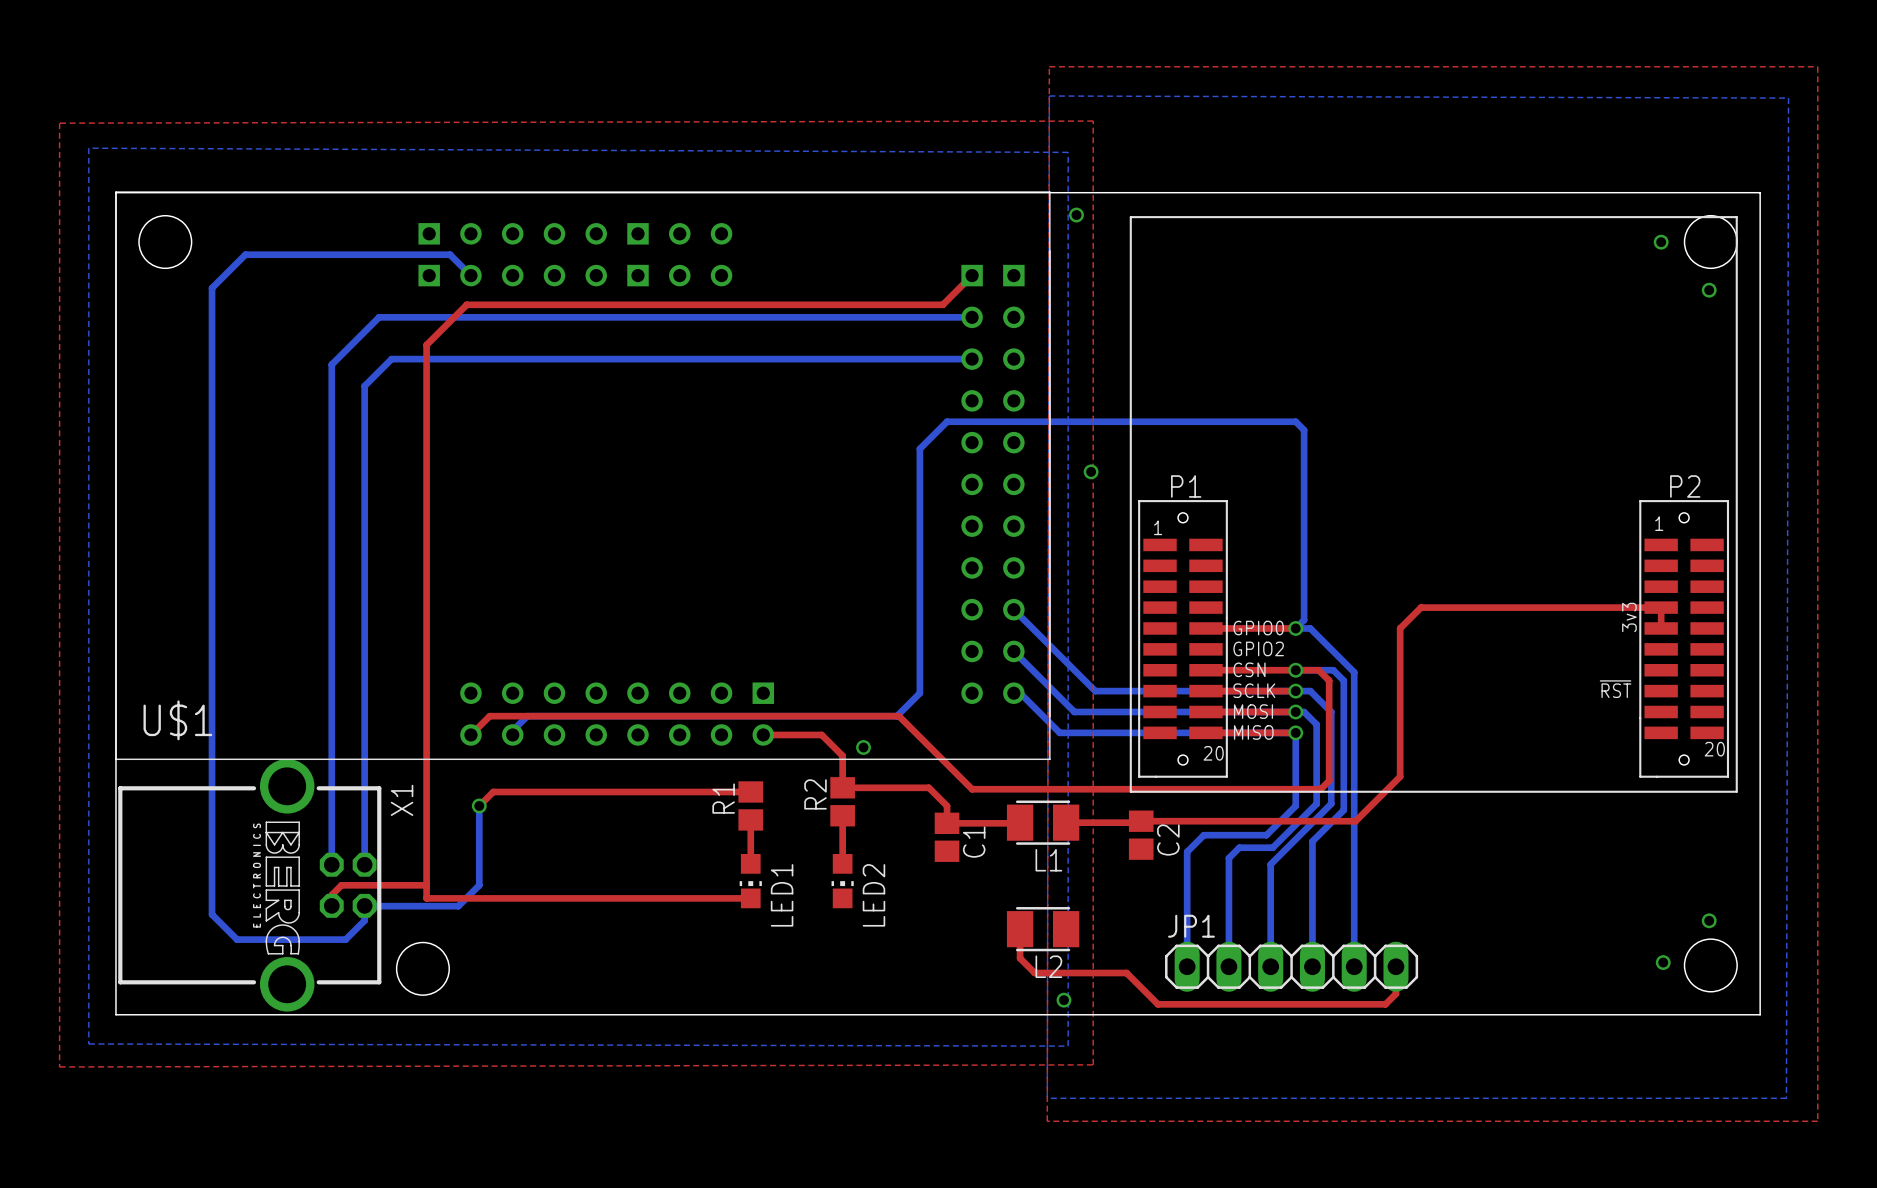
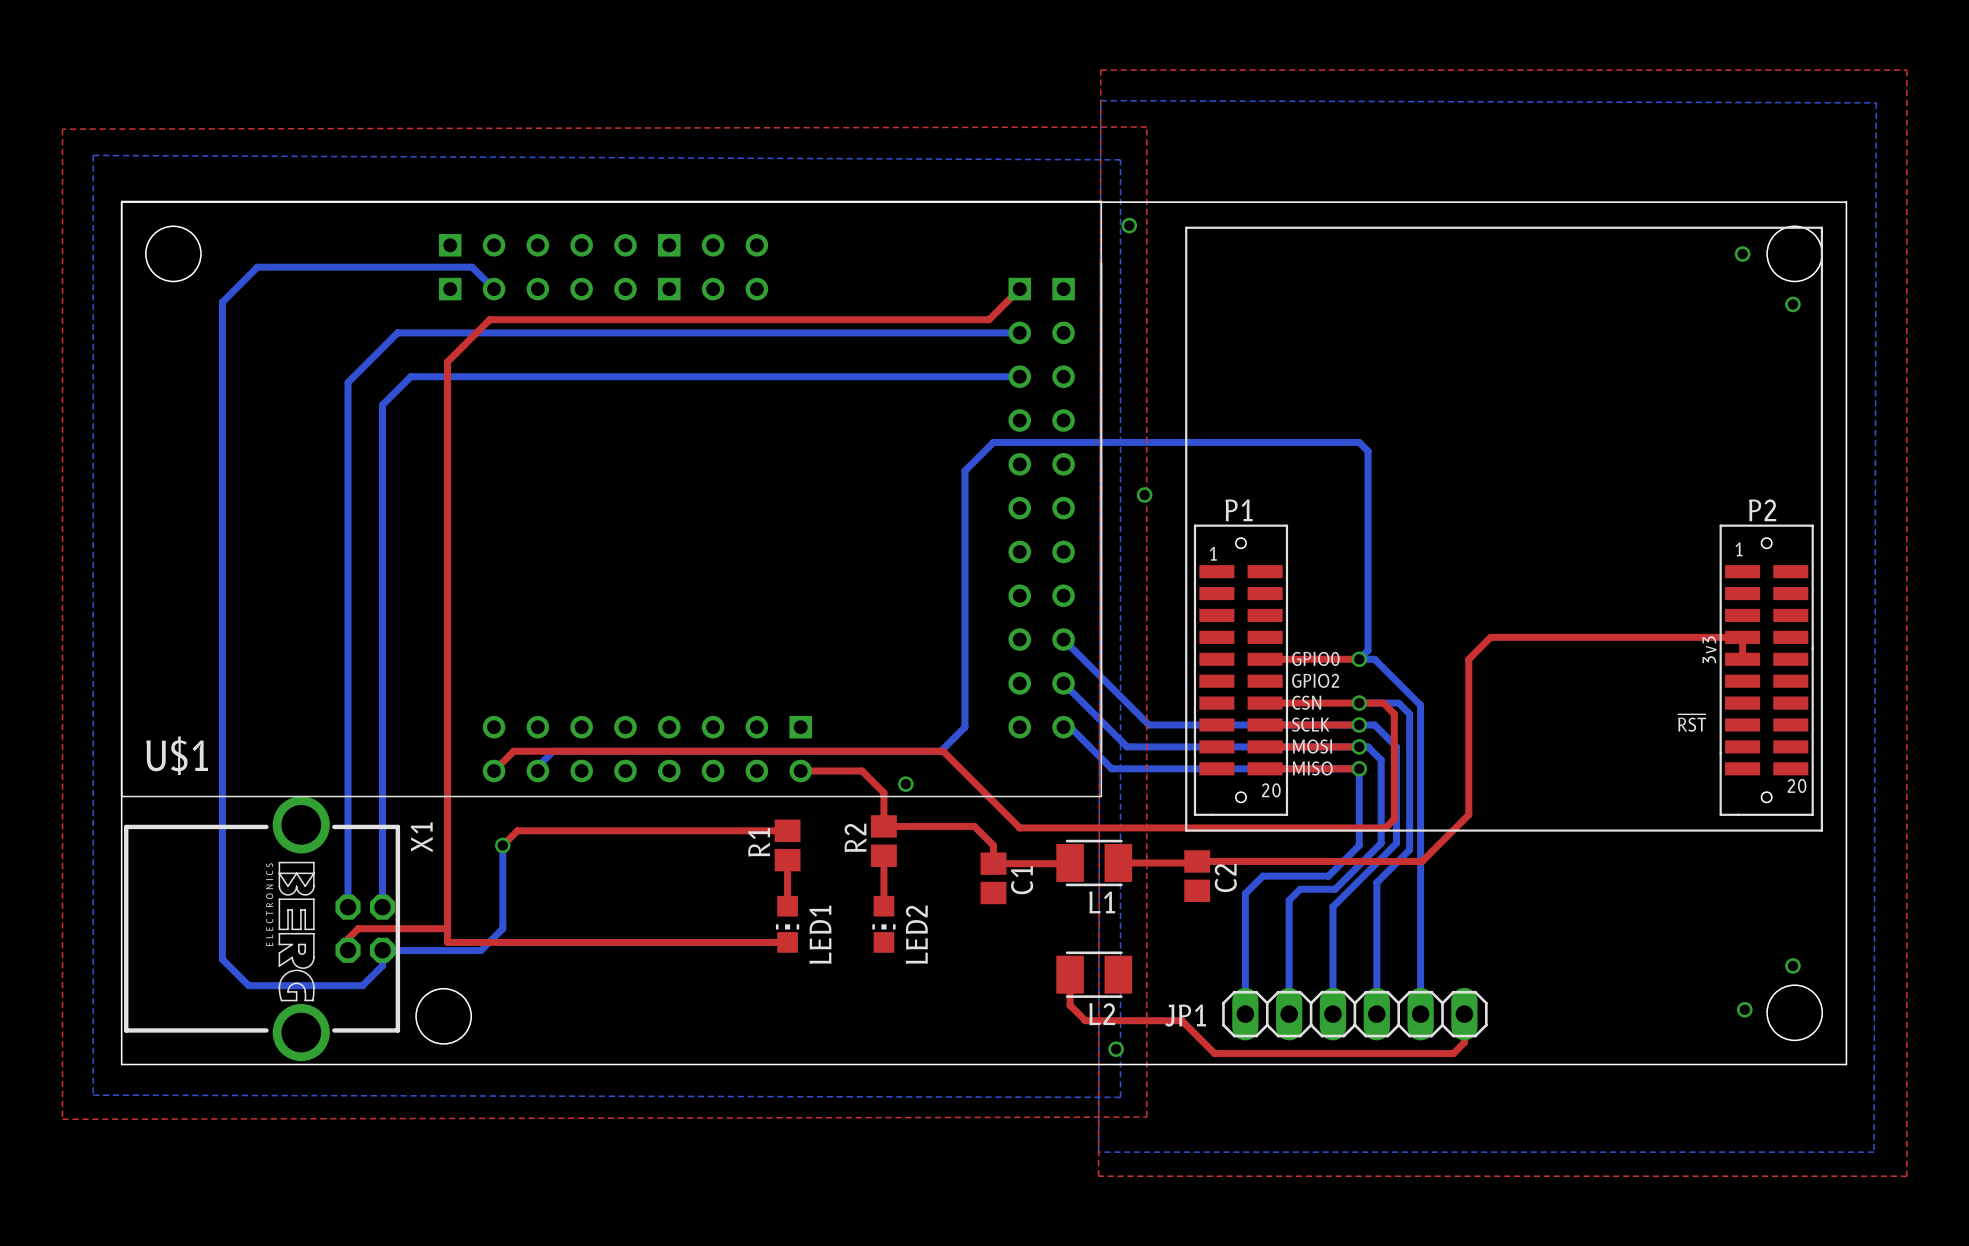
JP1 name position: JP1 (1191, 926) -> JP1 (1185, 1015)

